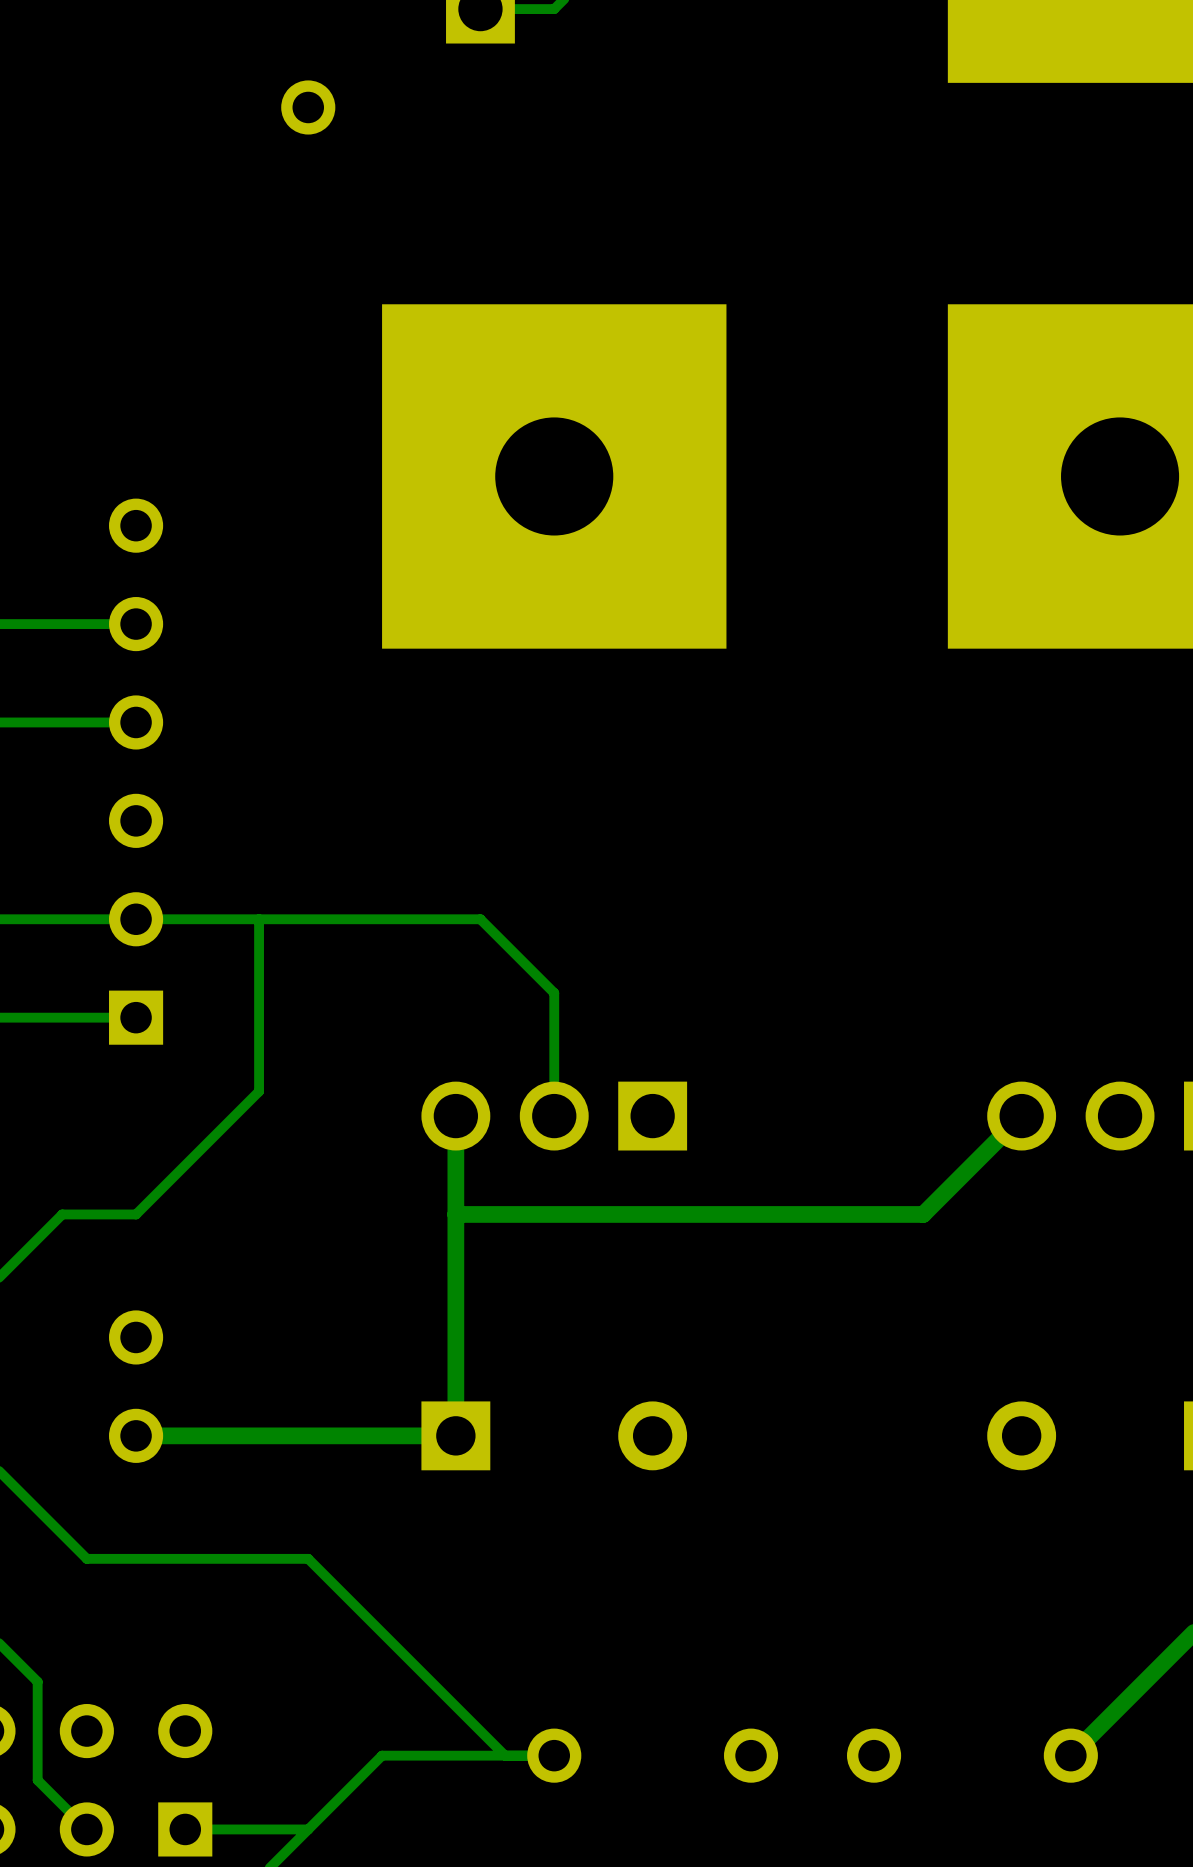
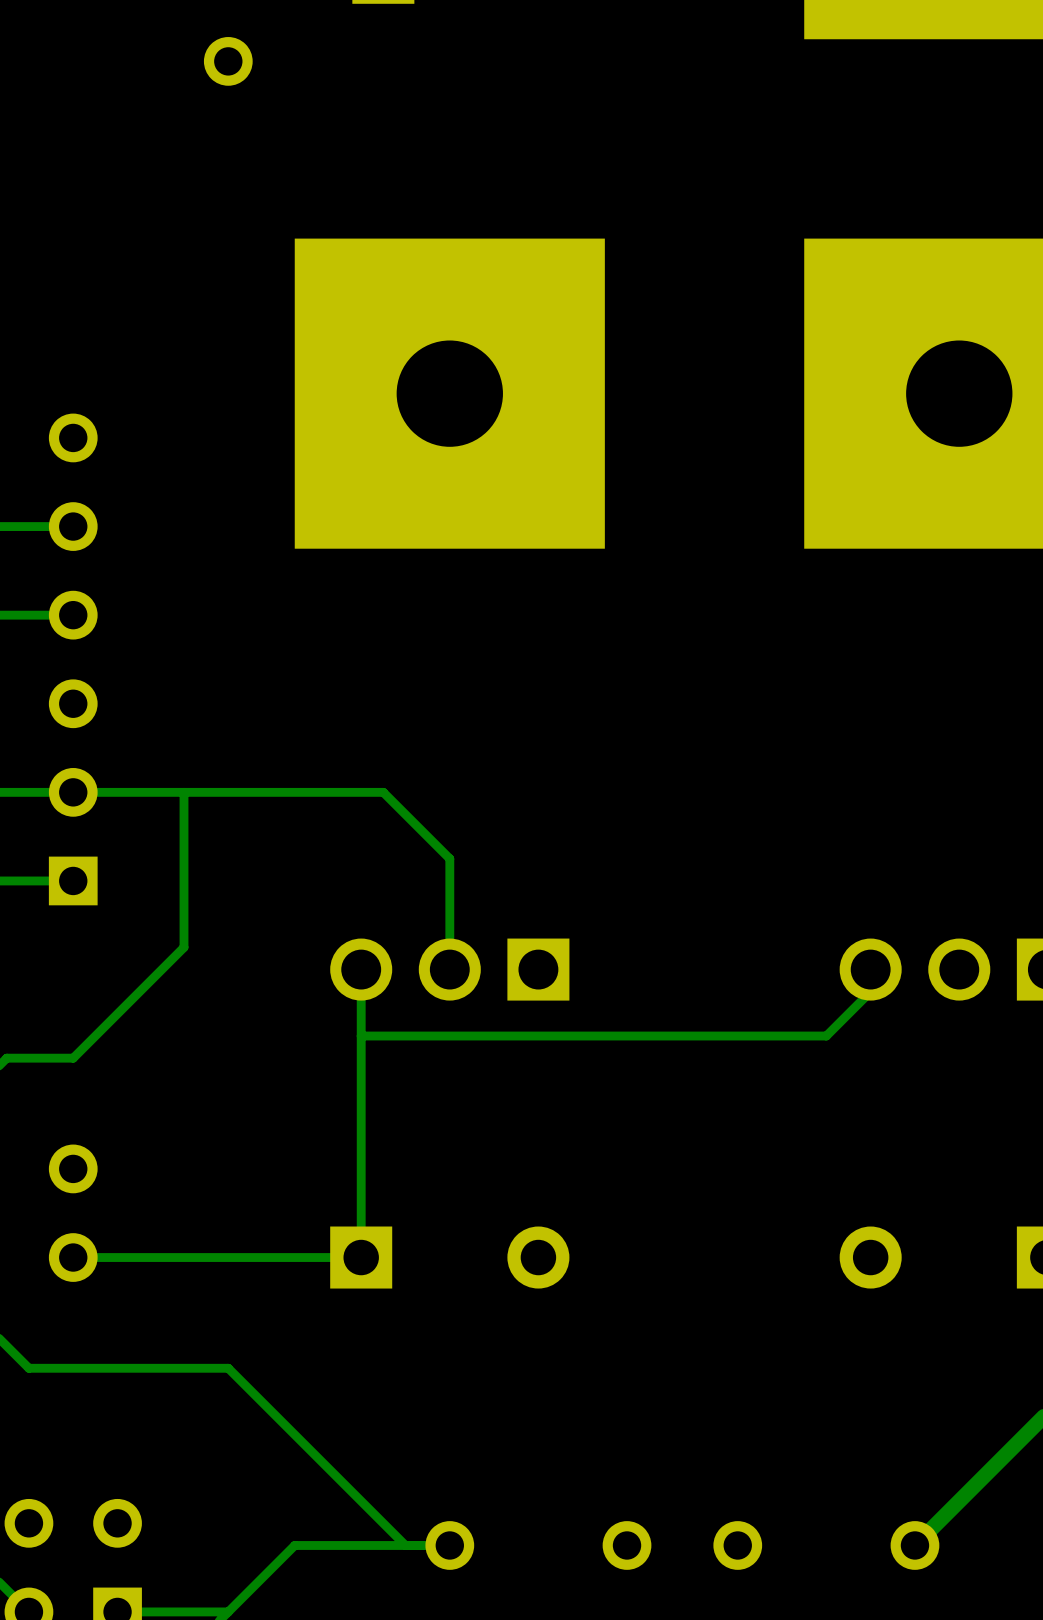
track width: thick (455, 1116) (455, 1435) (136, 1435) -> thin (361, 969) (361, 1257) (73, 1257)
track: (1021, 1116) (923, 1214) (455, 1214) -> (870, 969) (870, 991) (826, 1036) (361, 1036)

